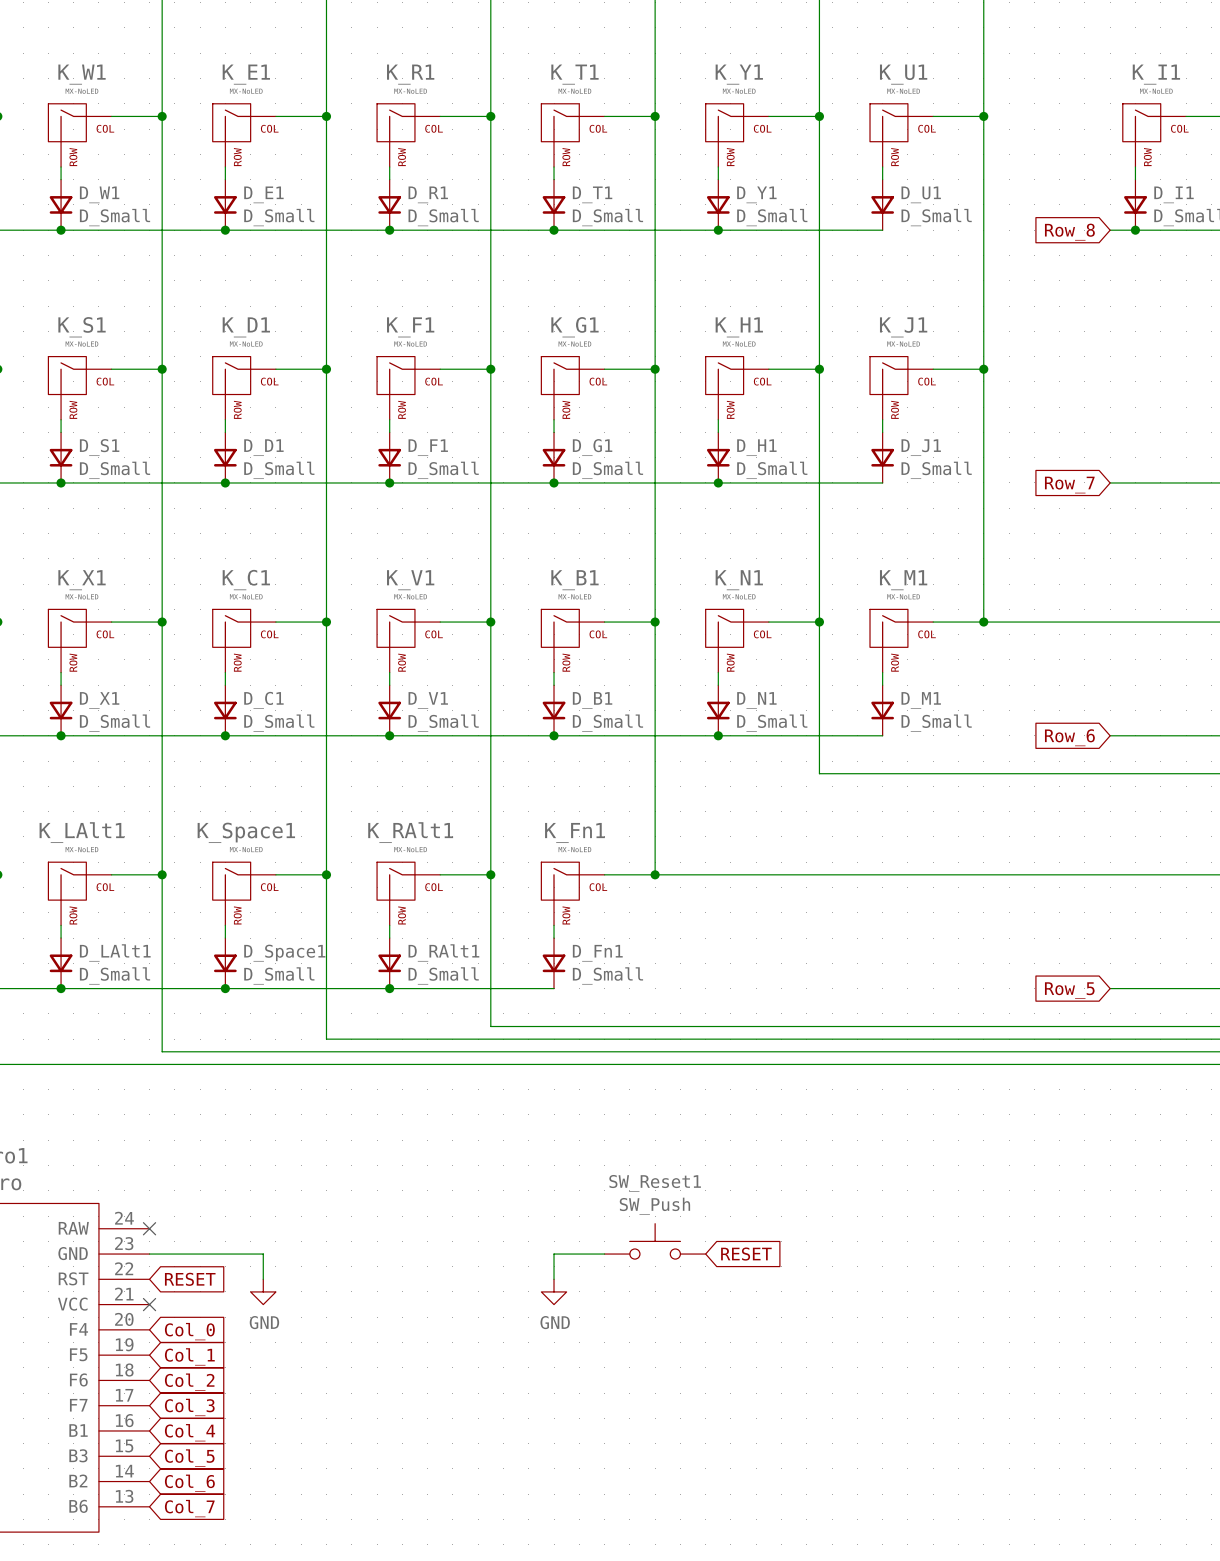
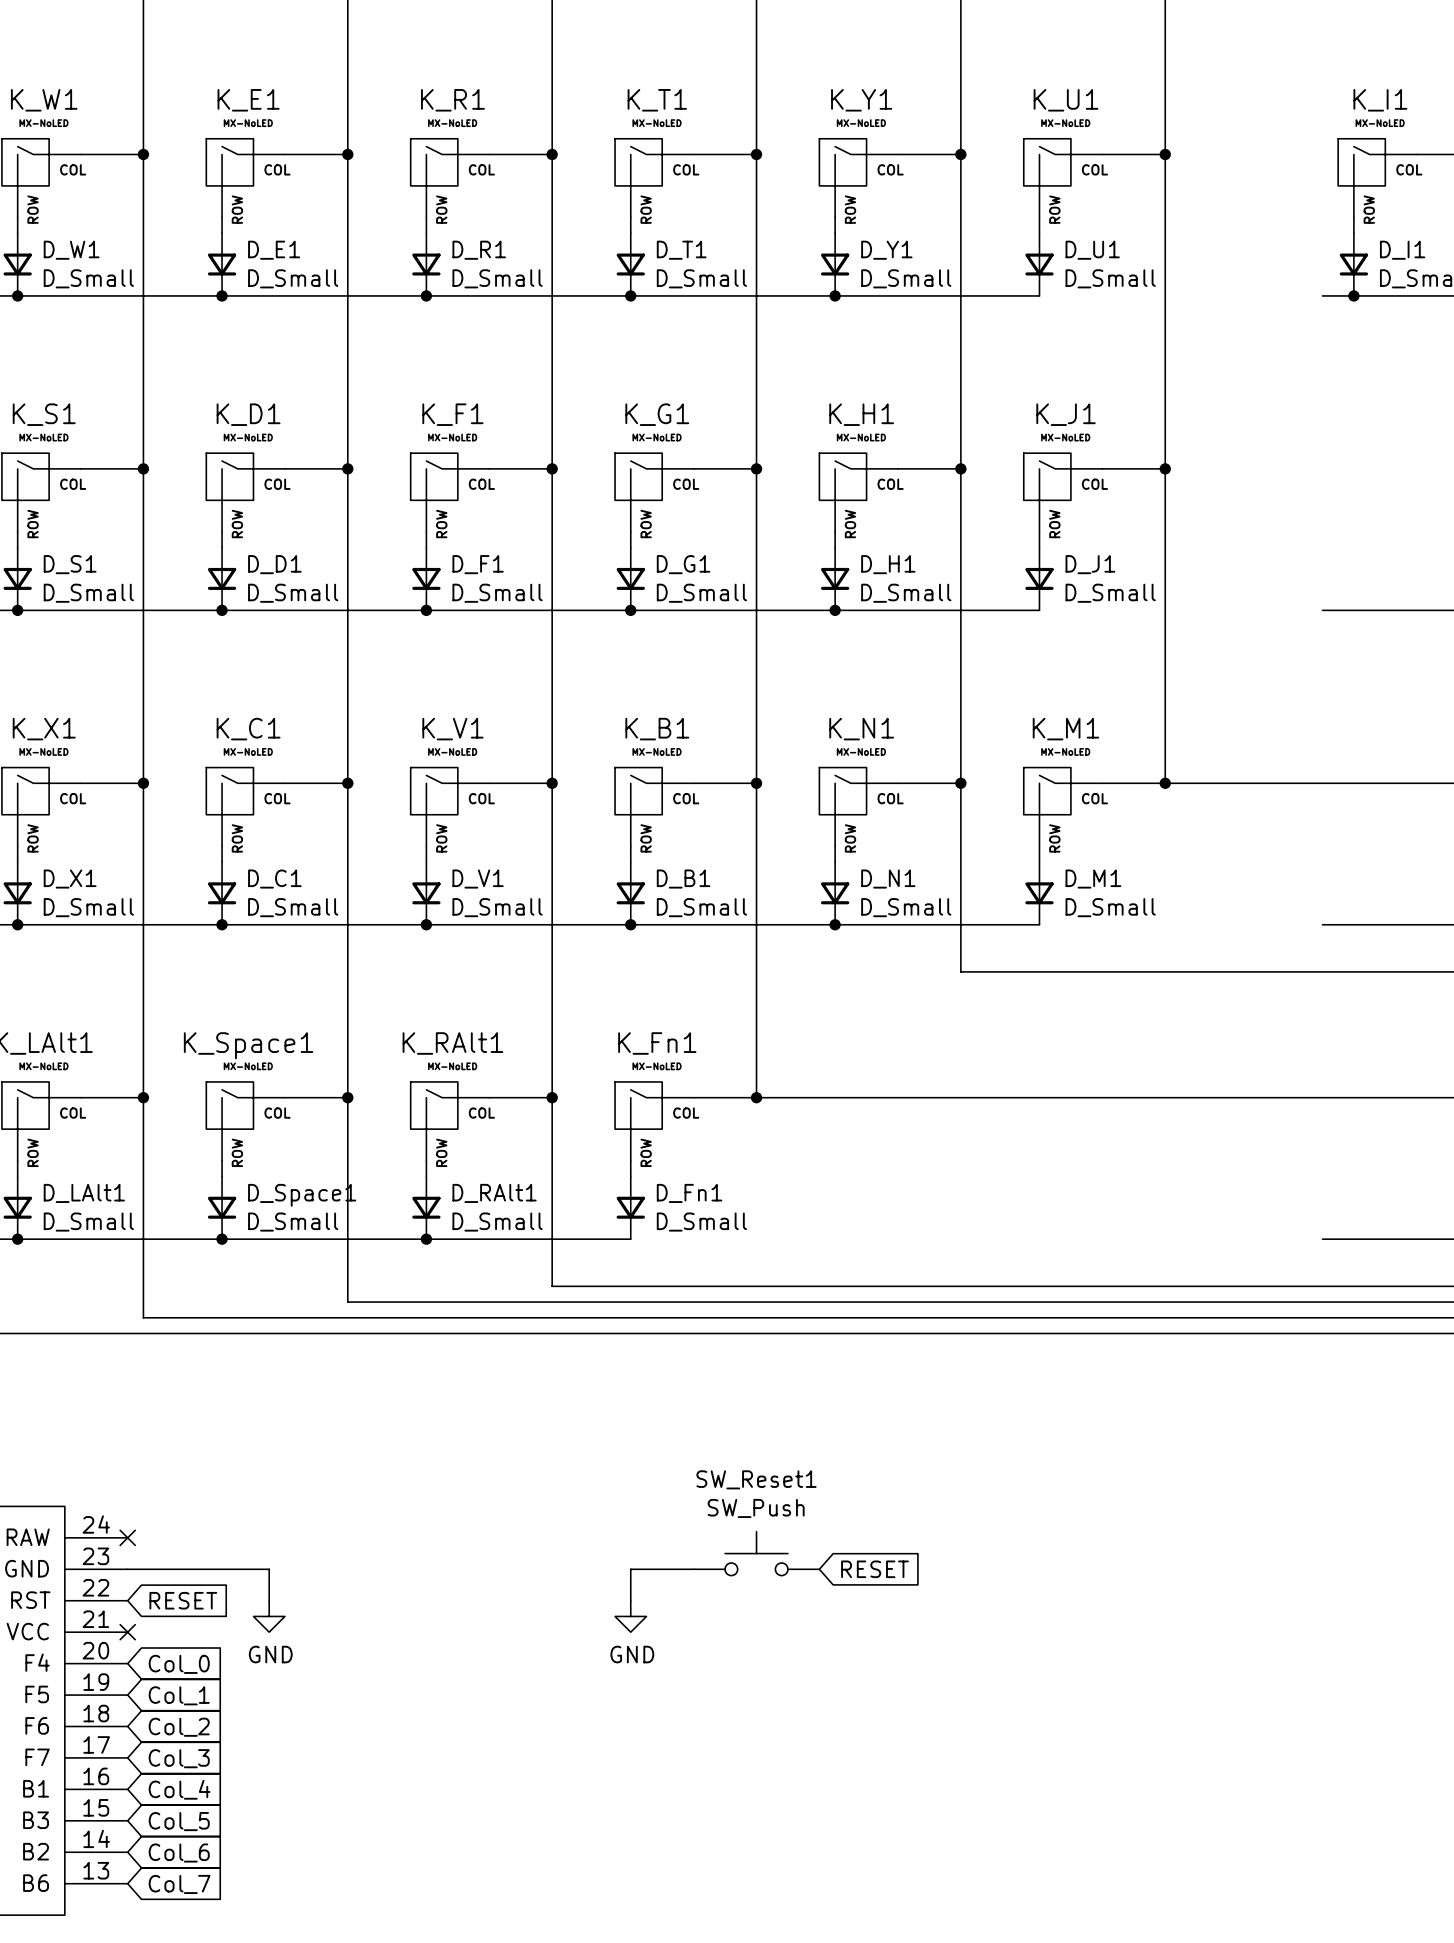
global label: Row_8 (1069, 232) -> none
global label: Row_7 (1069, 485) -> none
global label: Row_6 (1069, 737) -> none
global label: Row_5 (1069, 990) -> none

